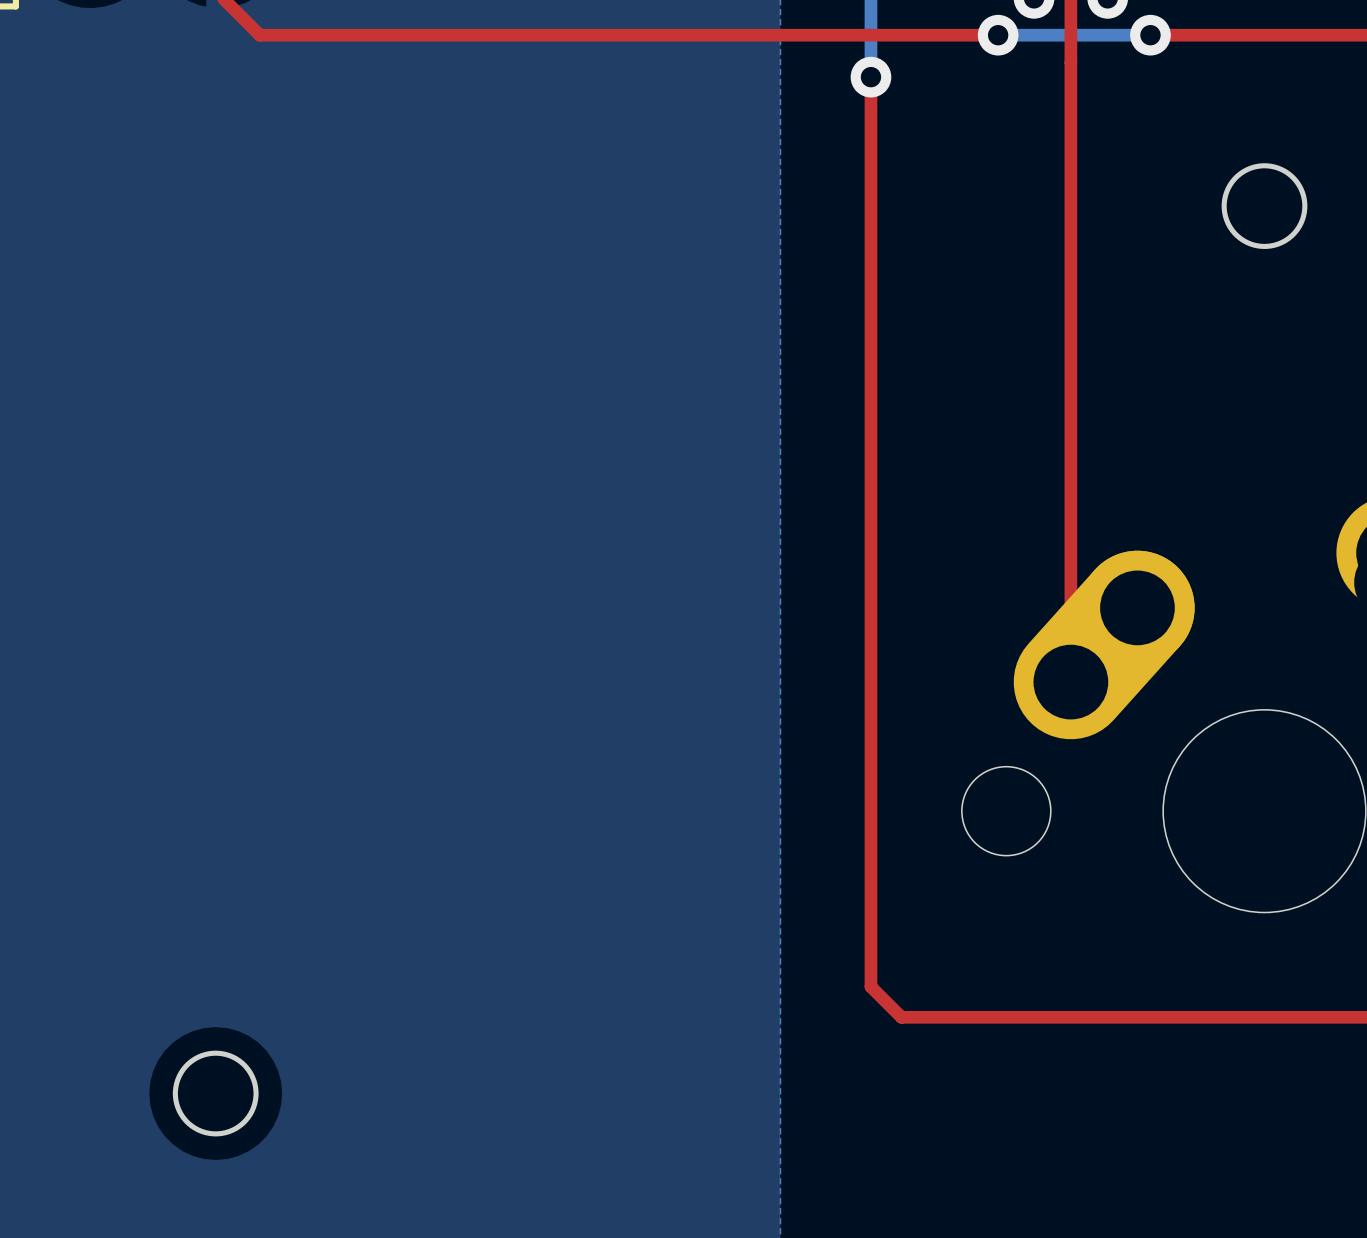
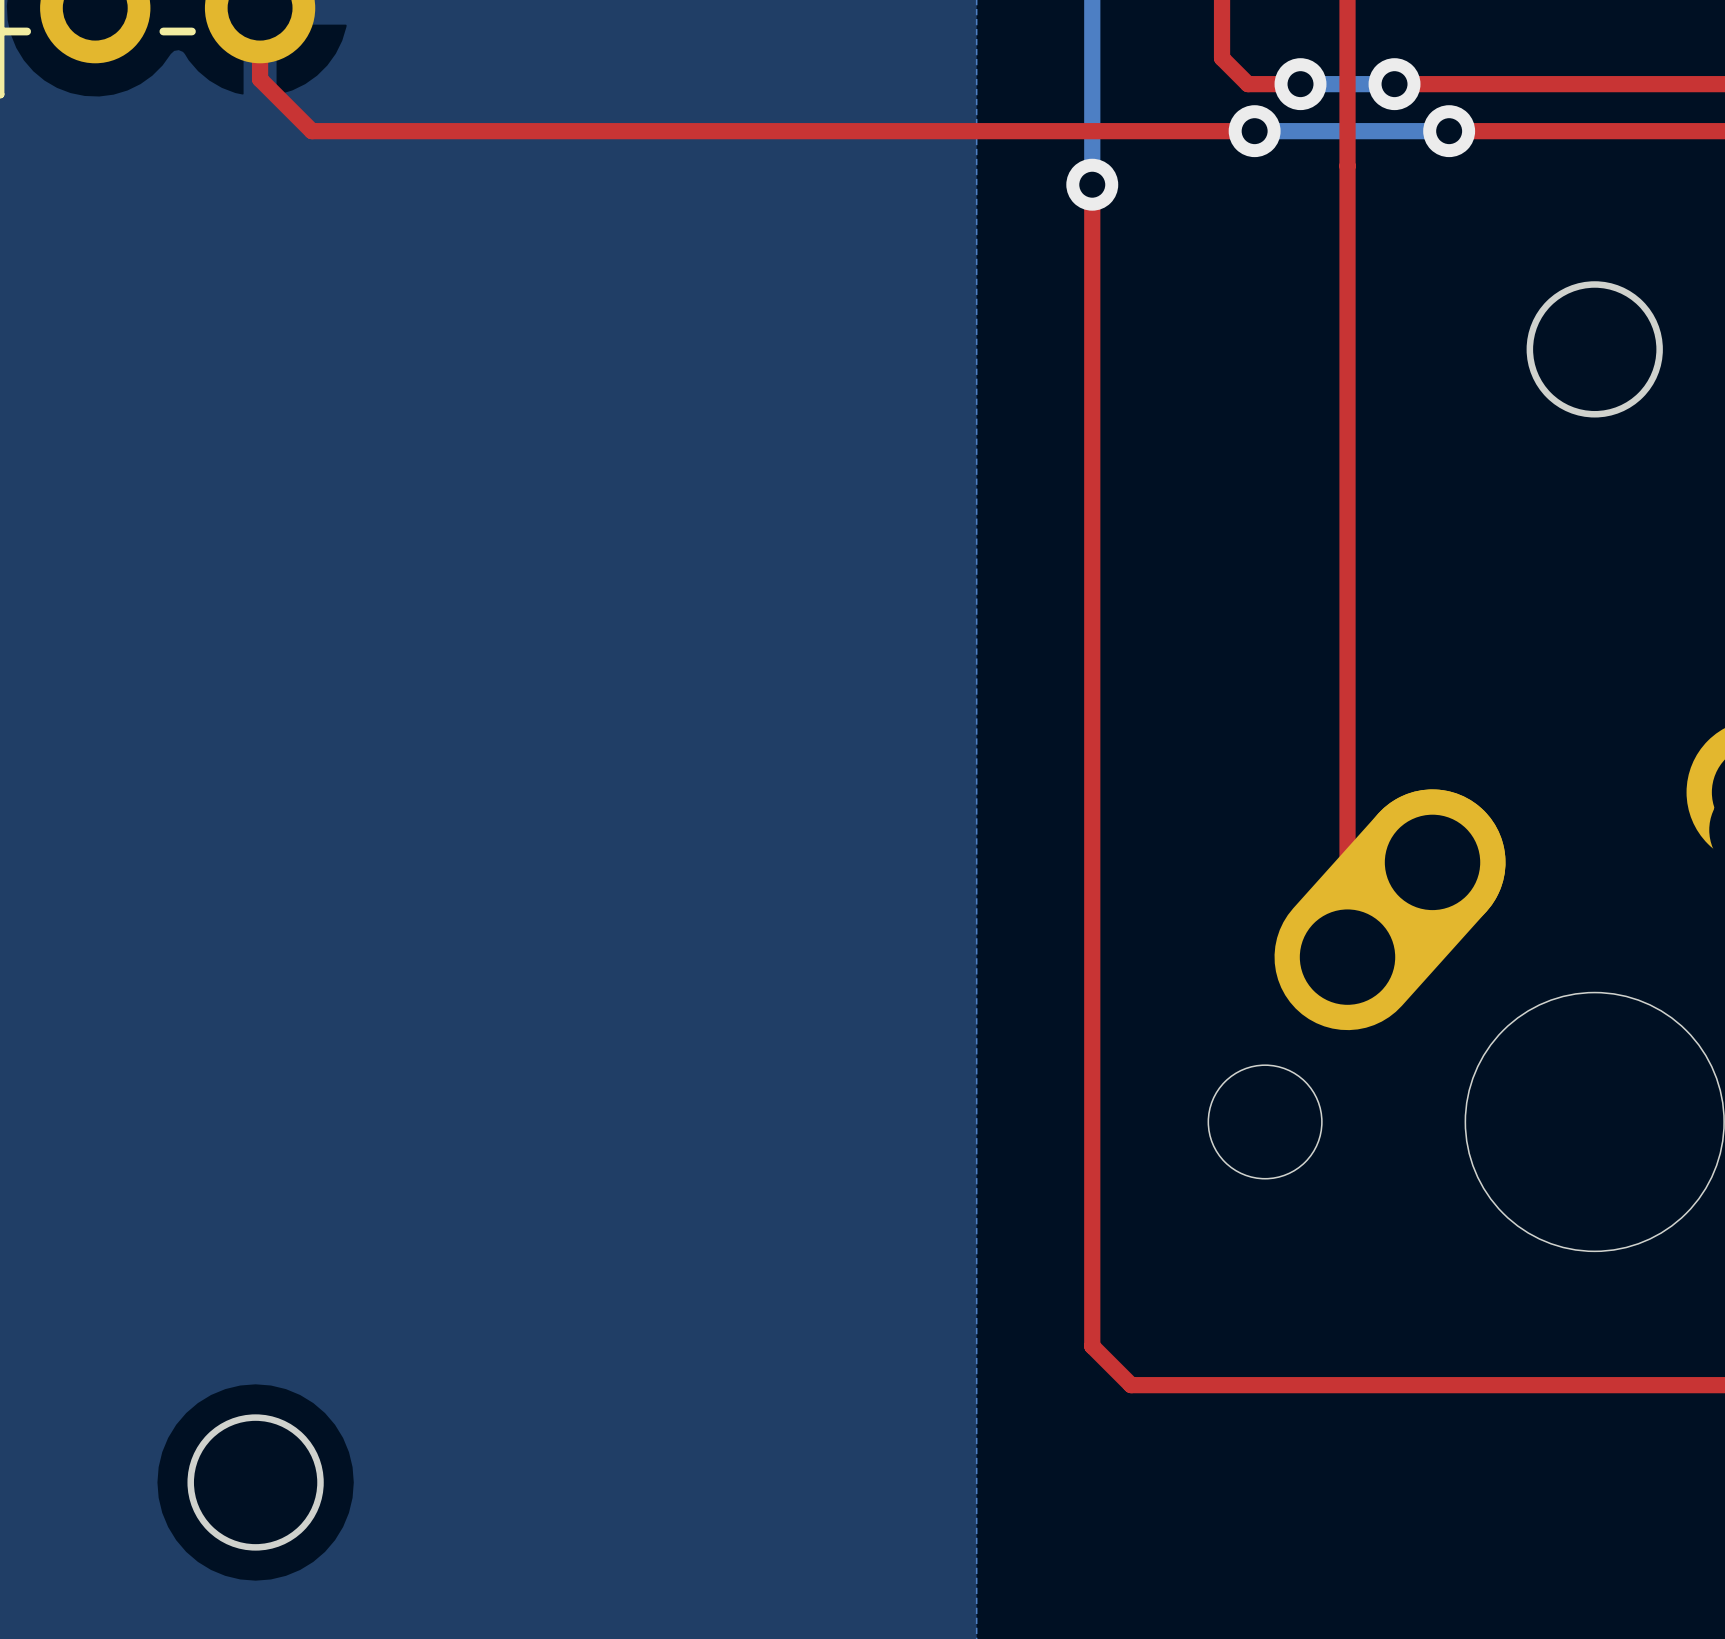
round board edge size: [1221, 163, 1308, 249] -> [1526, 281, 1663, 418]
round board edge size: [172, 1050, 259, 1137] -> [187, 1414, 324, 1551]

